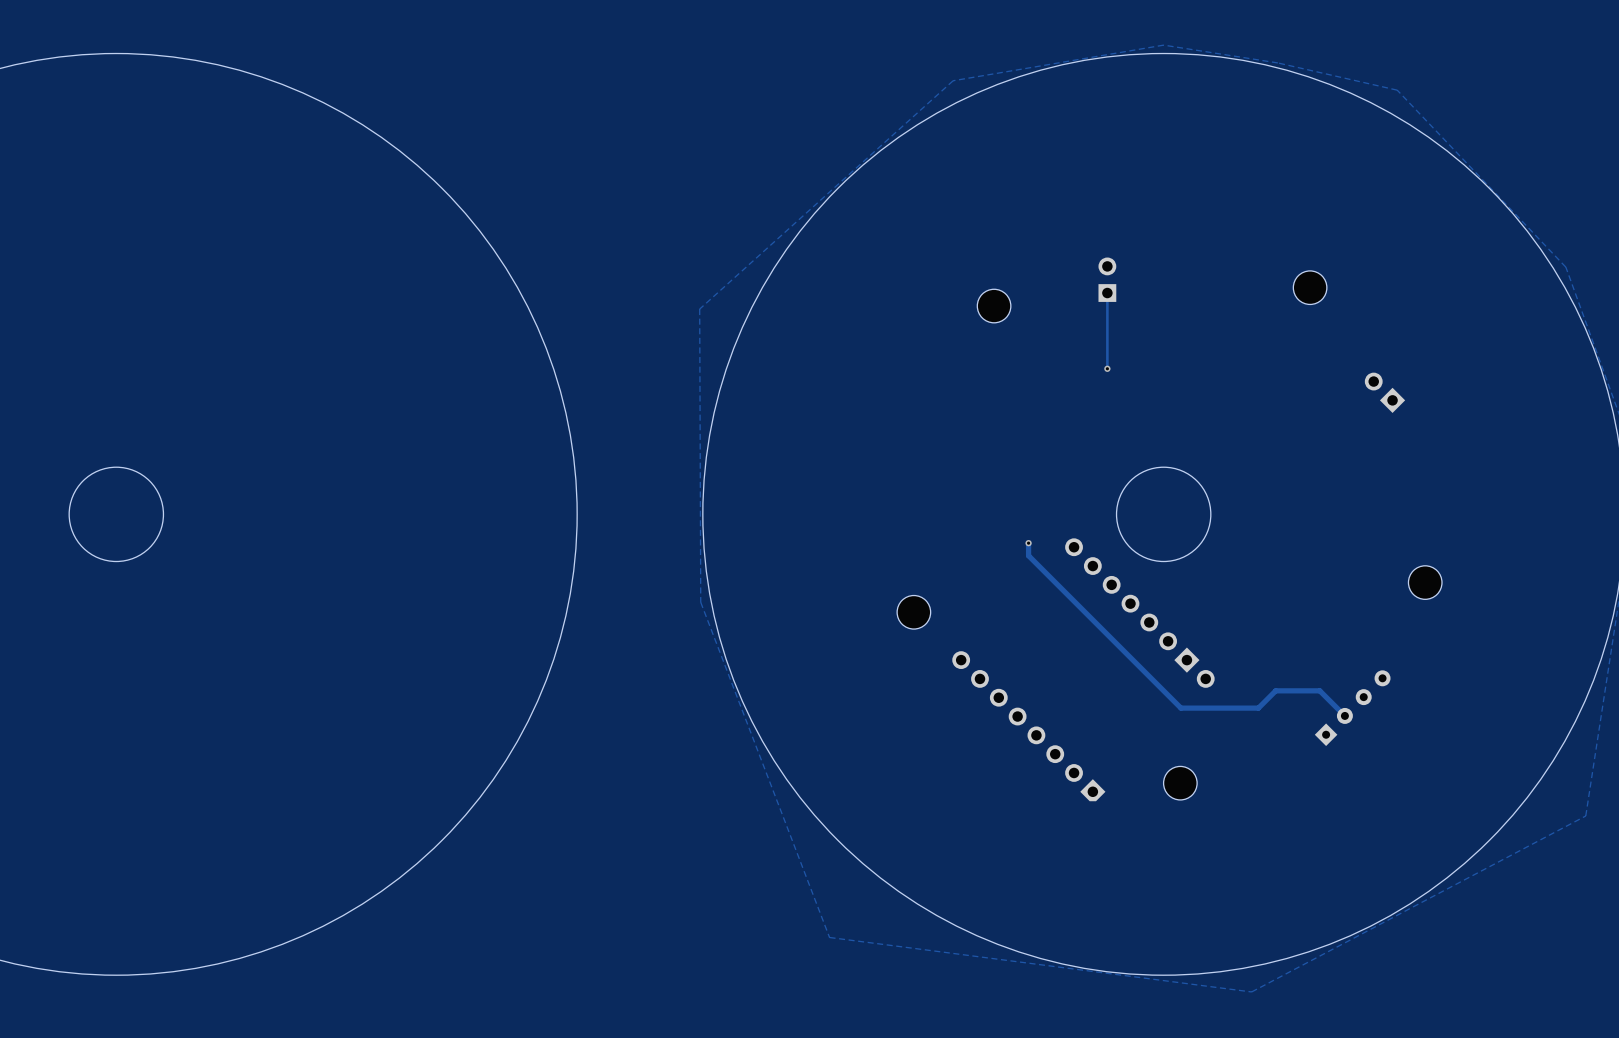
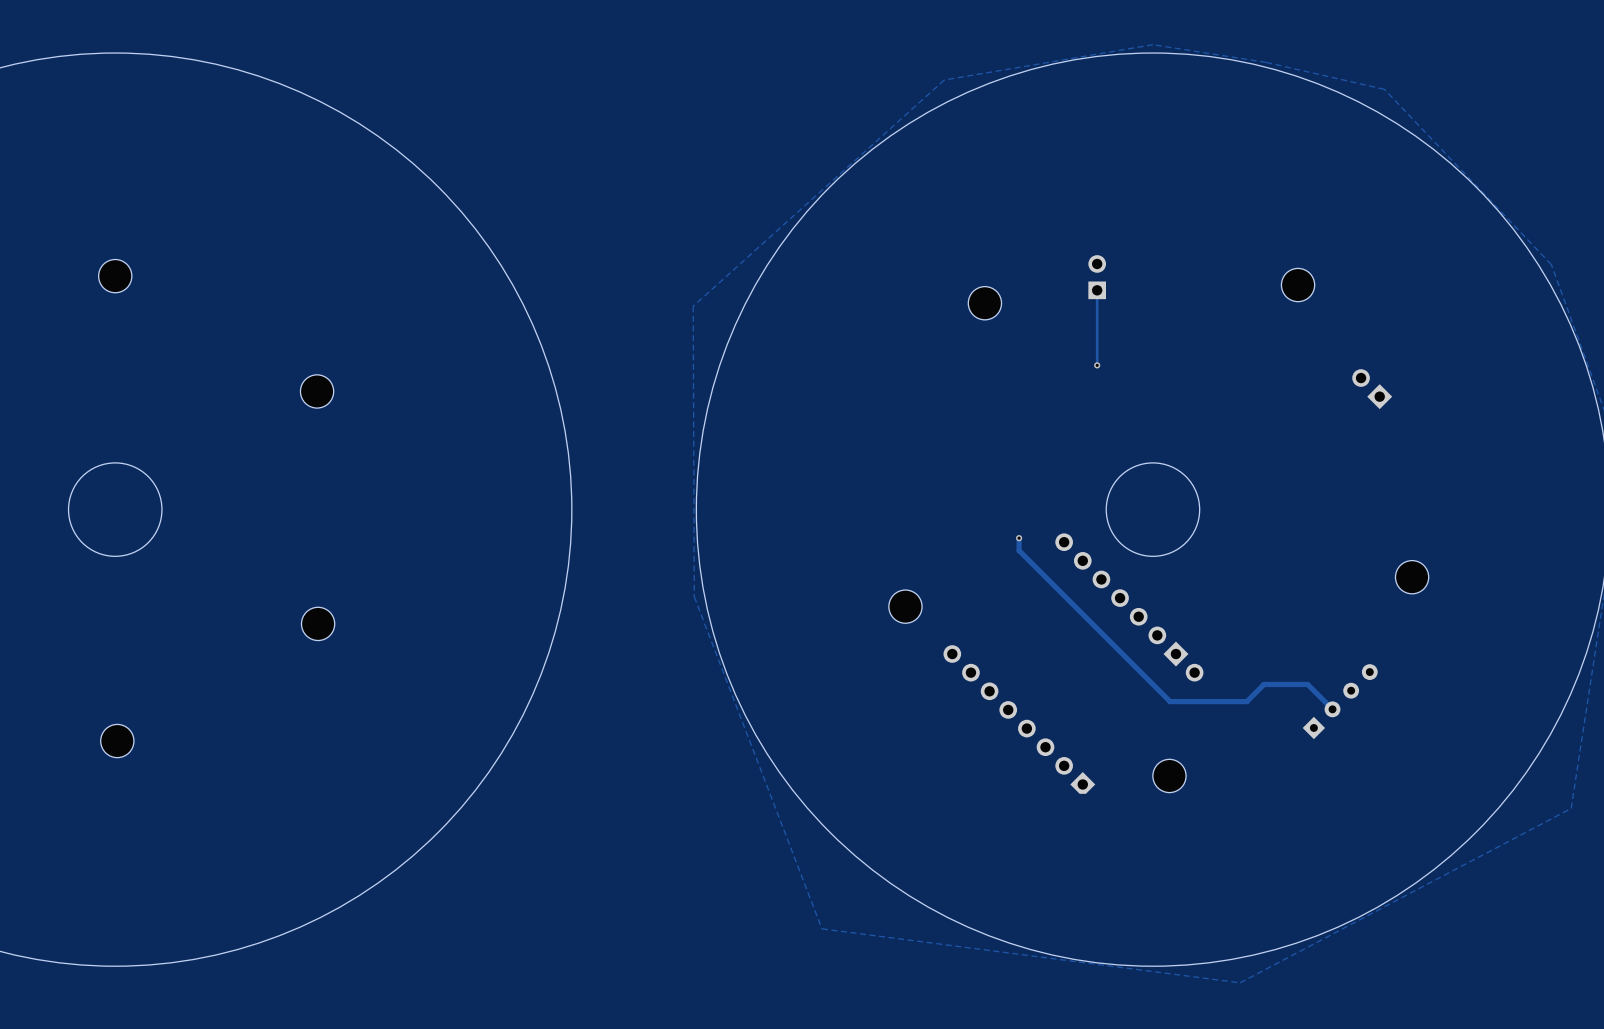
part: none -> (115, 276)
part: none -> (317, 391)
part: none -> (318, 623)
part: none -> (117, 741)

